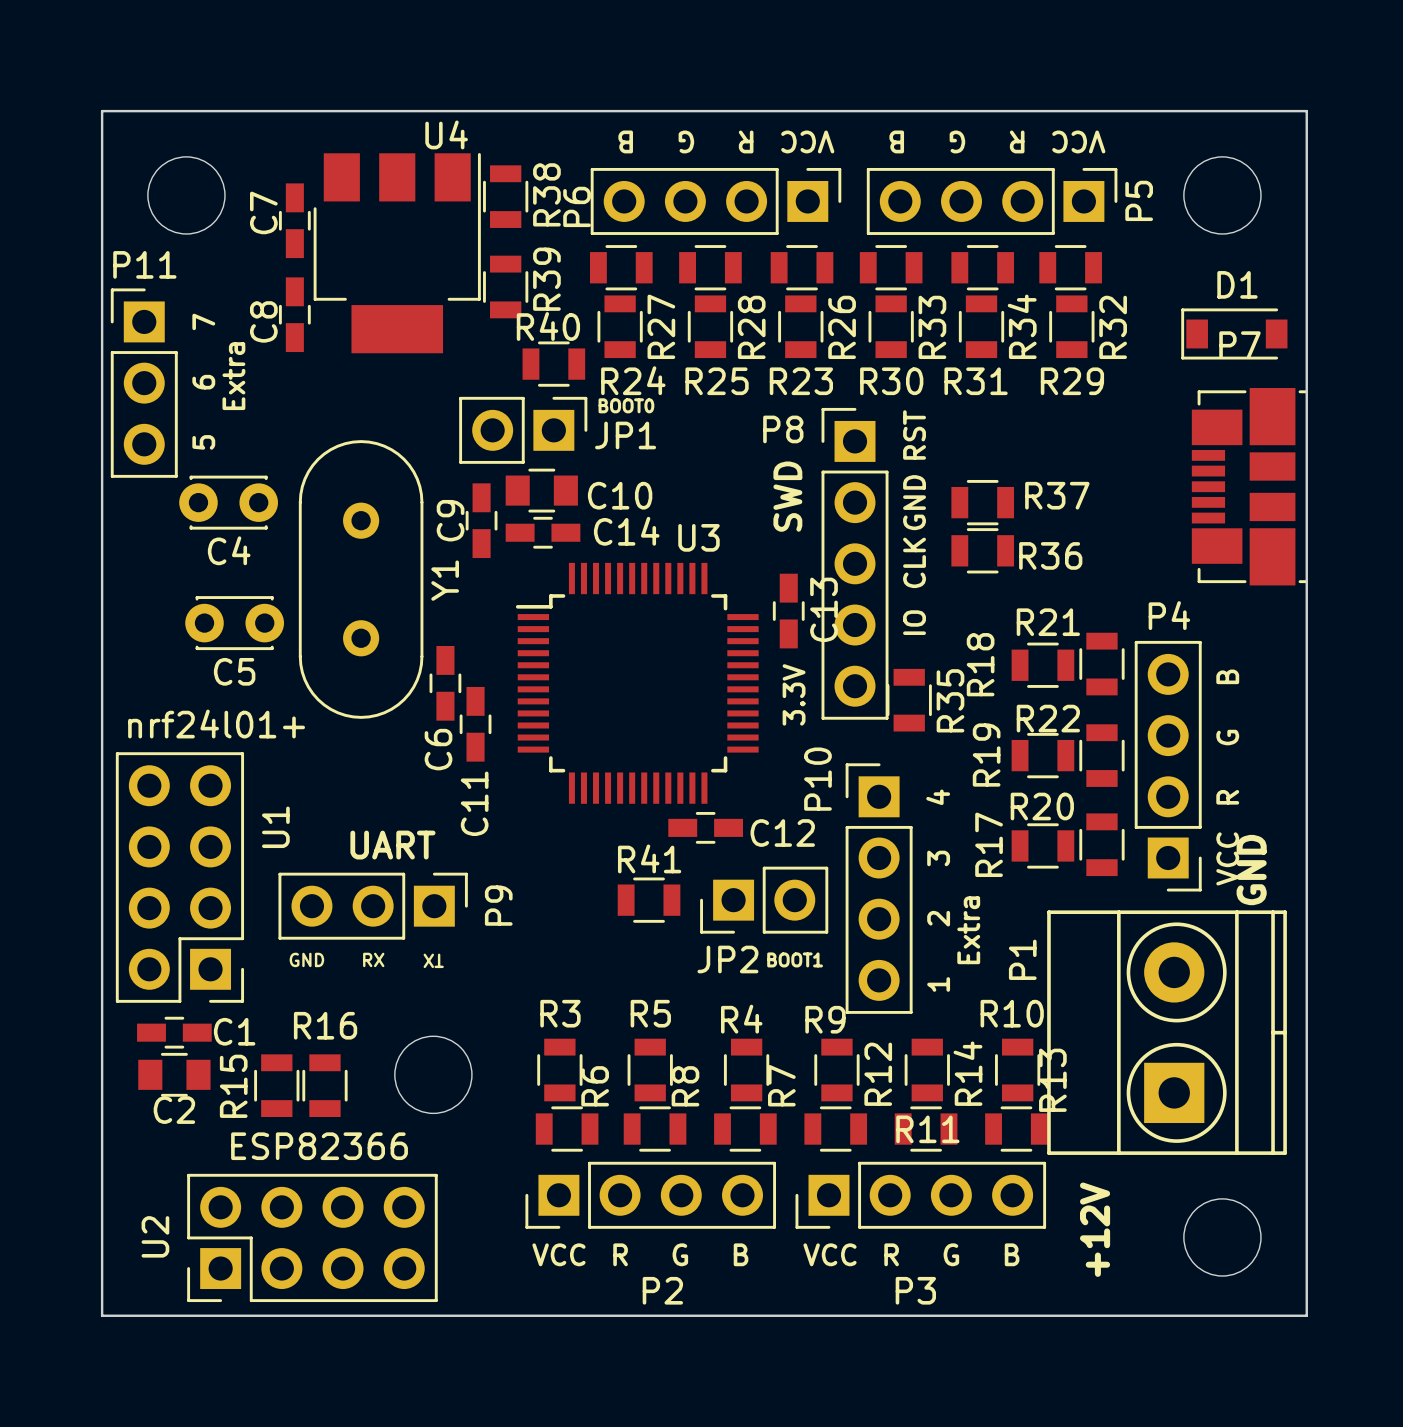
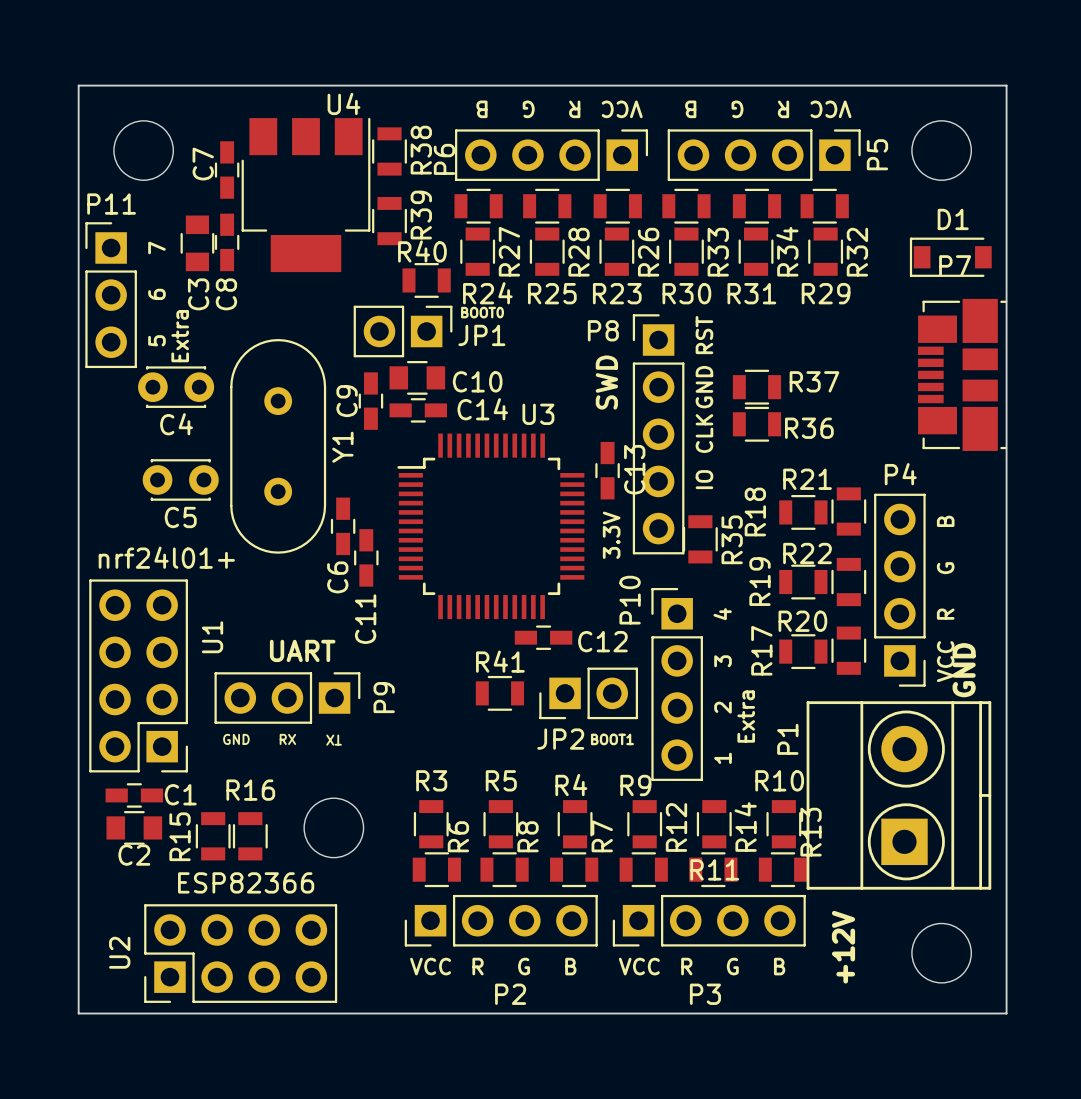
C3: none -> (197, 243)
C8 name position: C8 (263, 321) -> C8 (226, 294)
text position: Extra (233, 376) -> Extra (180, 336)

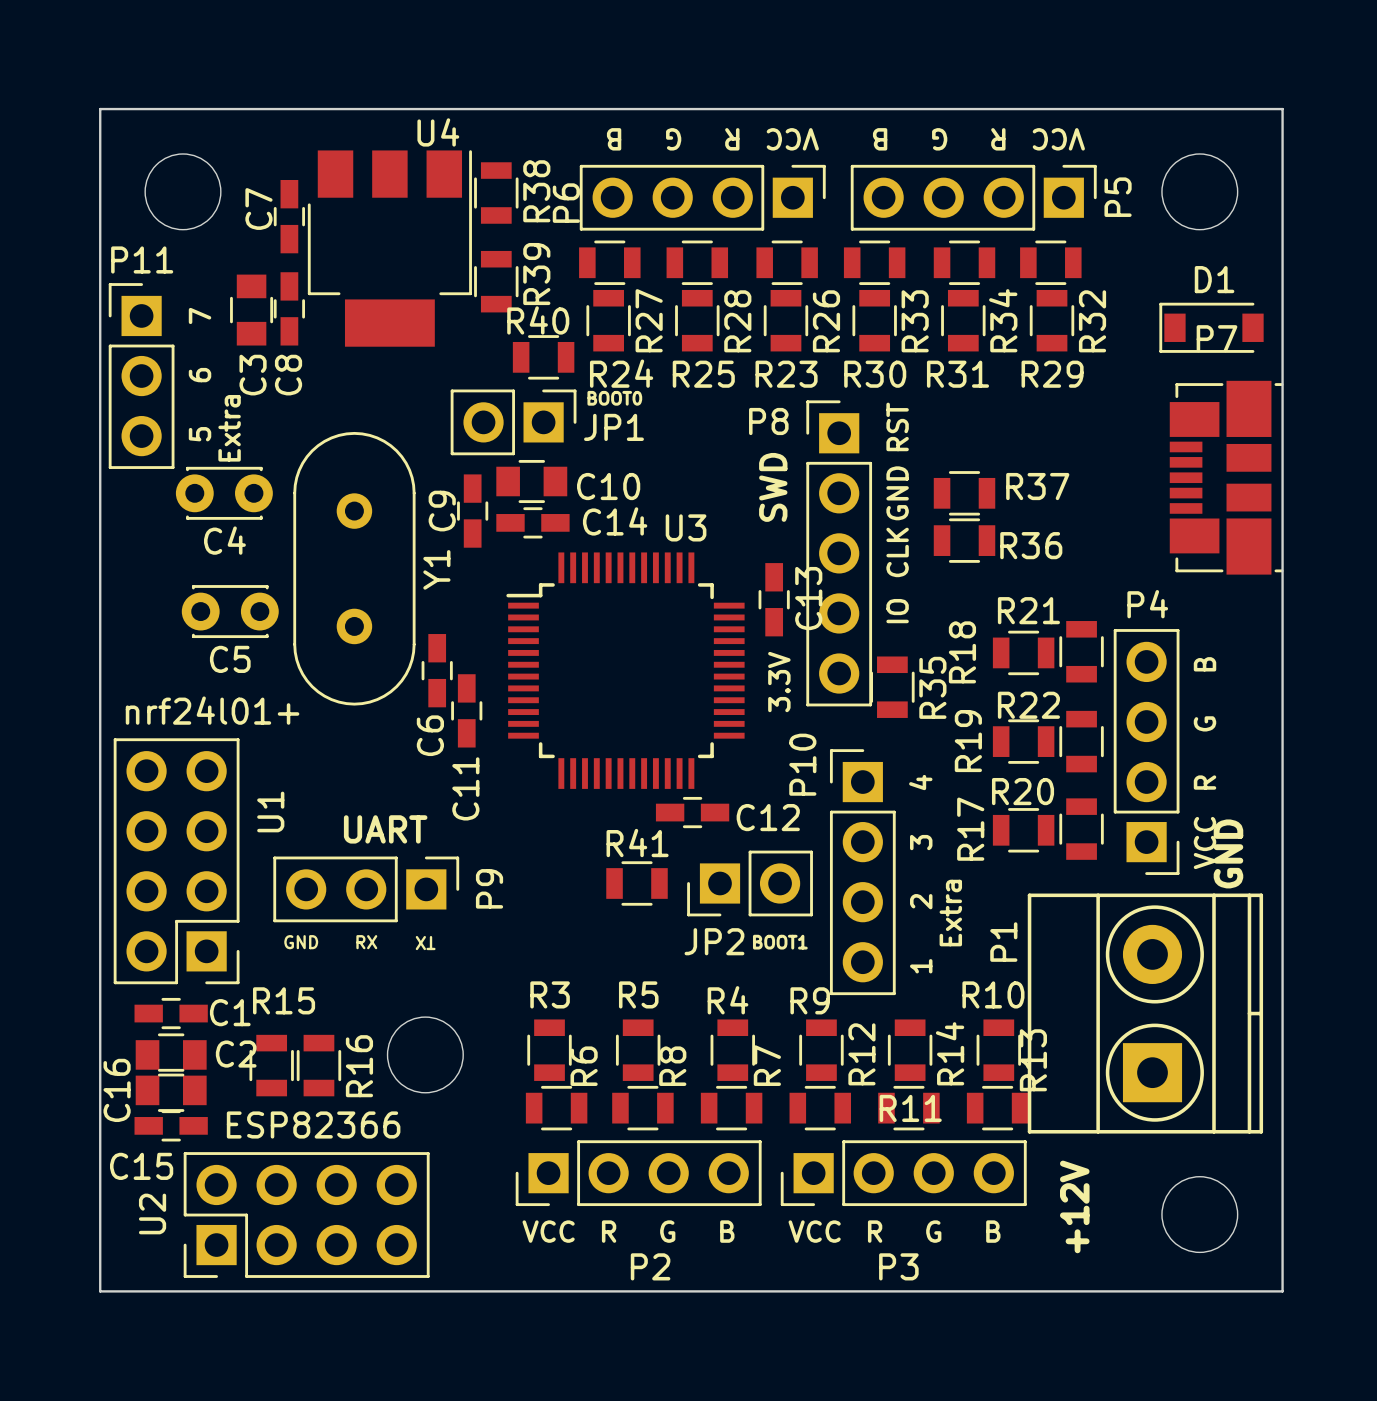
R16 name rotation: 0° (250, 790) -> 90° counterclockwise (359, 1066)
R15 name rotation: 0° (180, 836) -> 90° clockwise (284, 1000)
R15 name position: R15 (180, 836) -> R15 (284, 1000)
C2 name position: C2 (134, 855) -> C2 (236, 1054)
C16: none -> (171, 1090)
C15: none -> (171, 1125)

